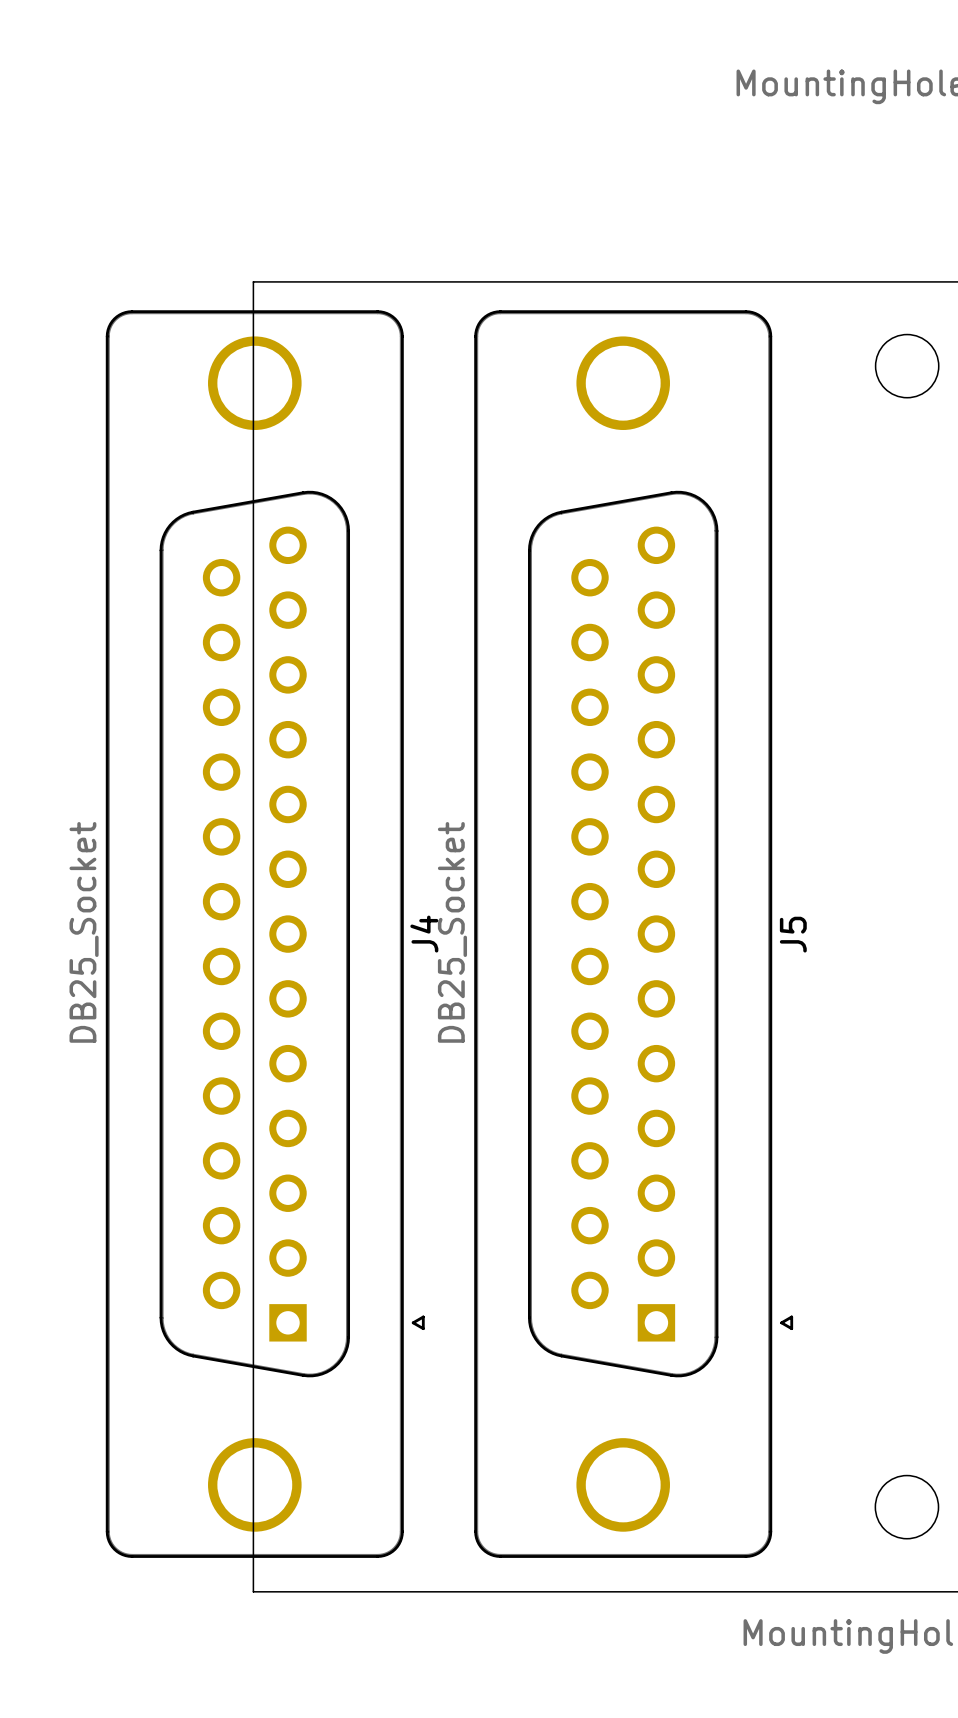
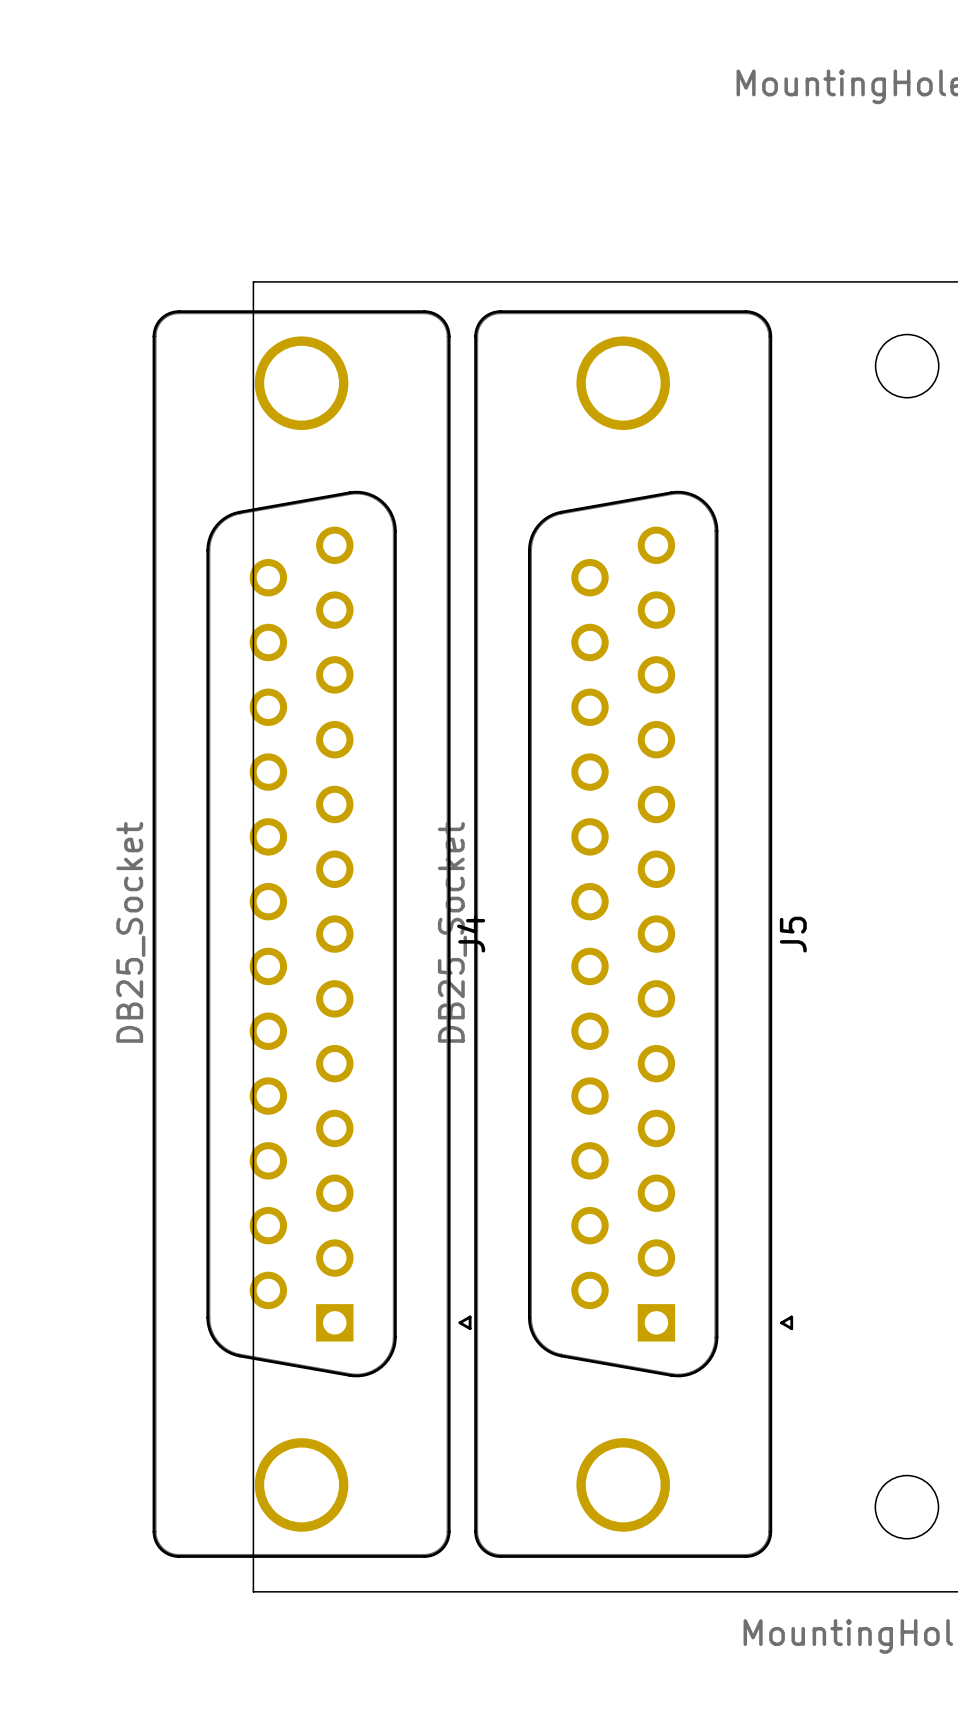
J4 position: (265, 934) -> (312, 934)

